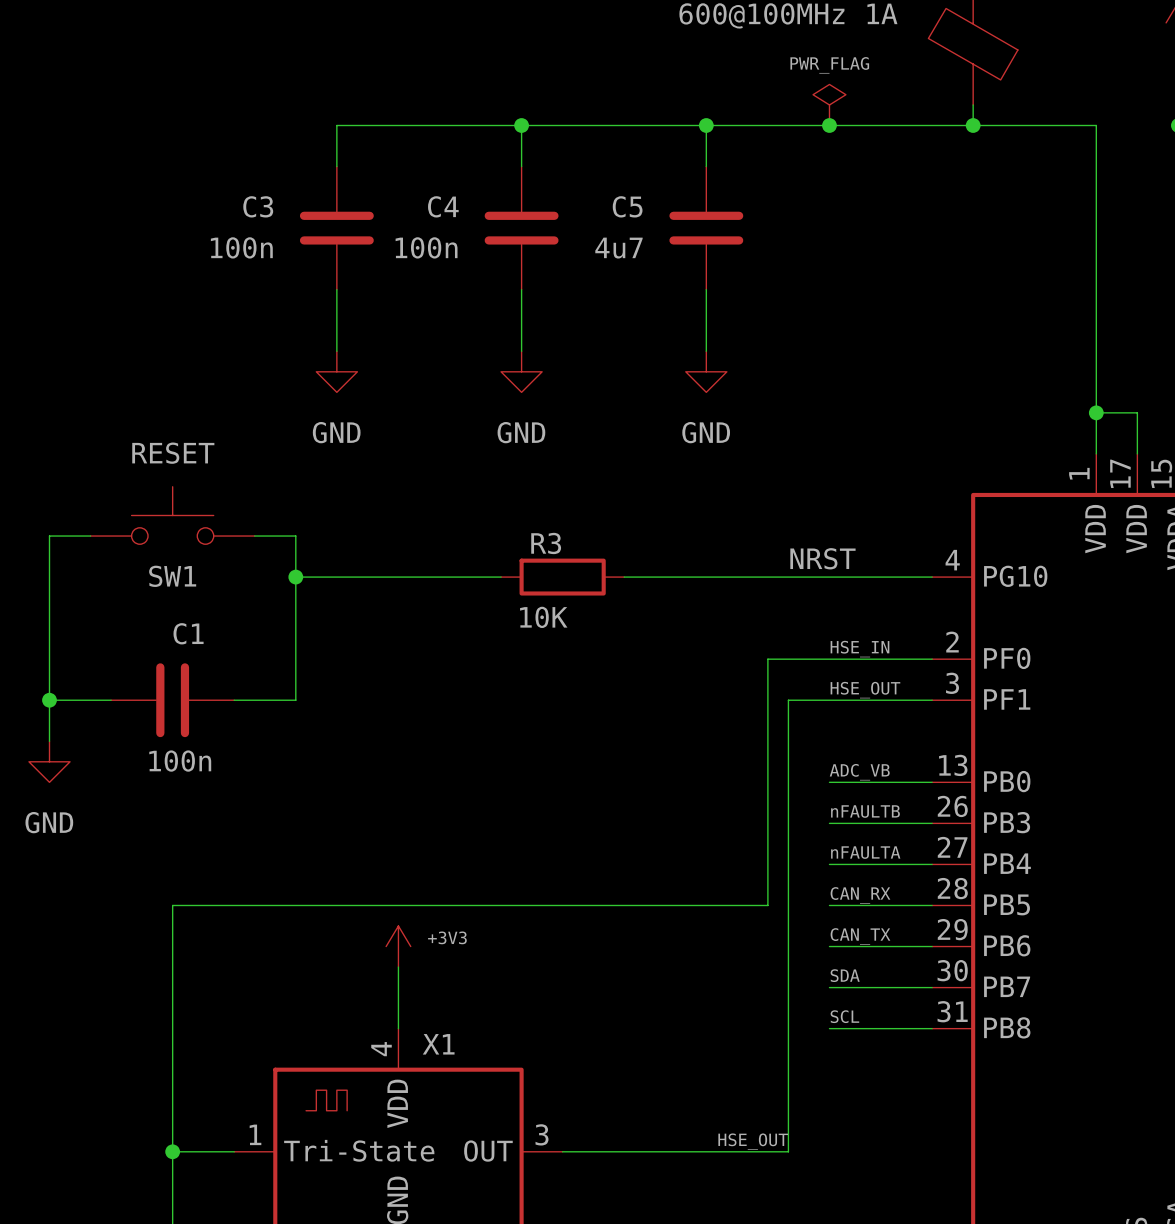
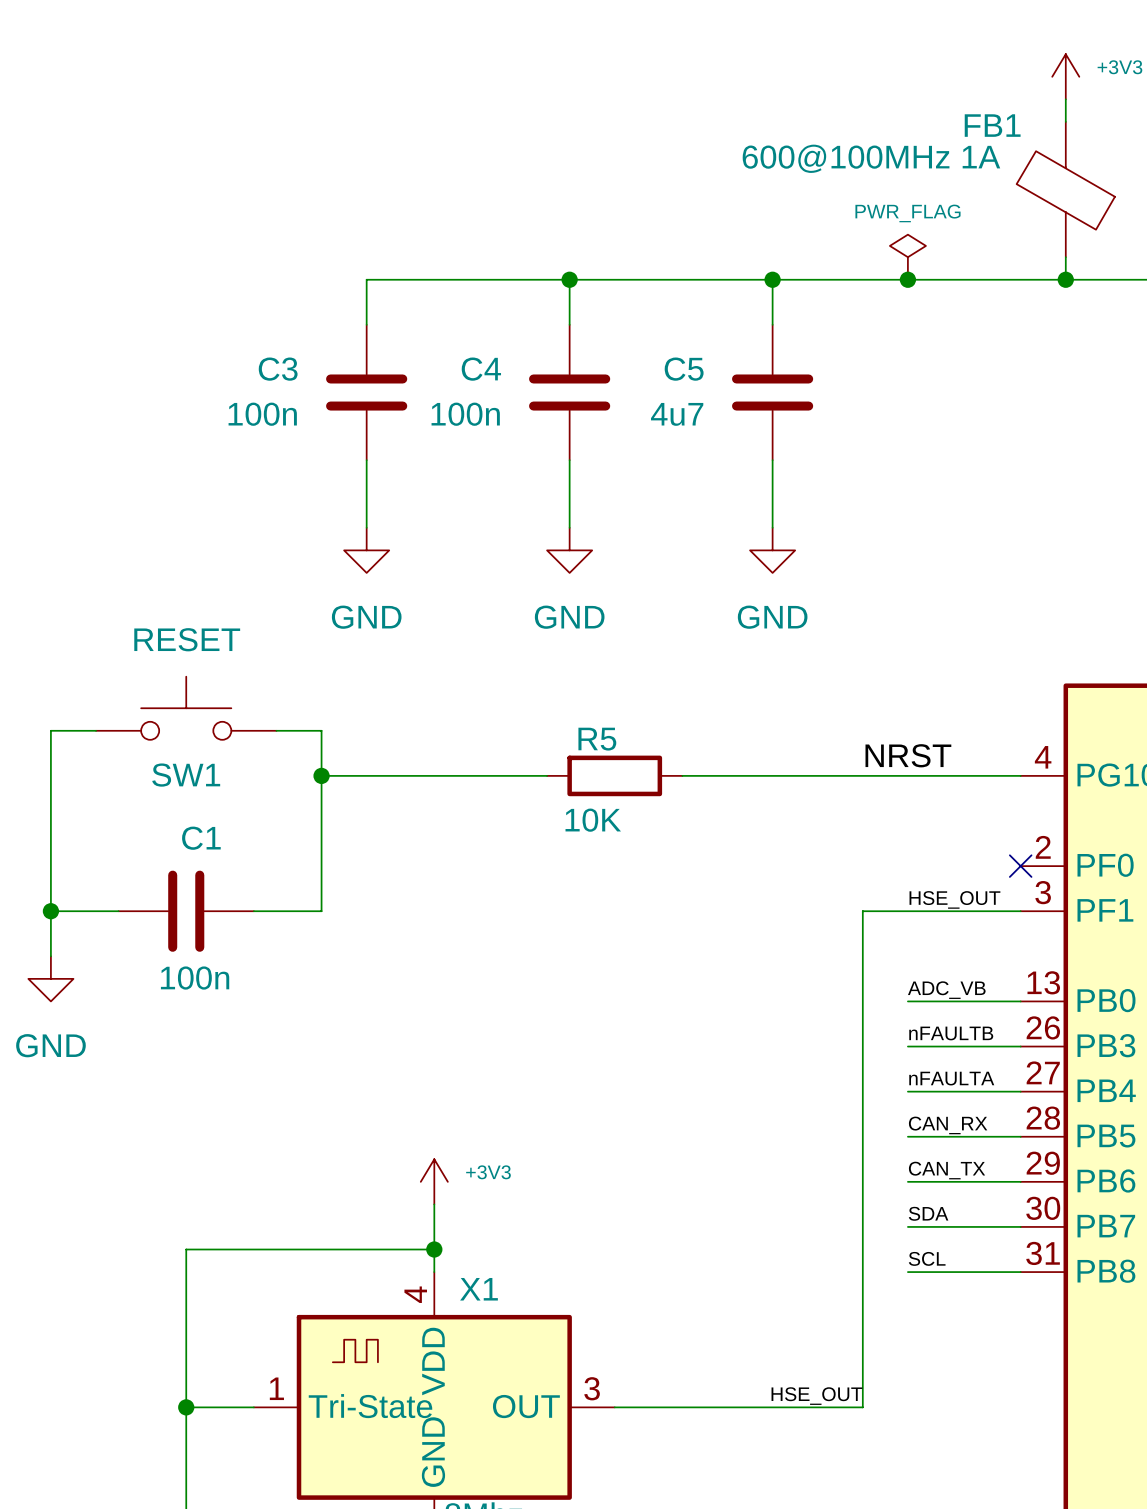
R3 name: R3 (546, 543) -> R5 (597, 739)
label: HSE_IN (859, 649) -> none
wire: (932, 659) (767, 659) (767, 905) (172, 905) (172, 1008) -> (434, 1249) (186, 1249)
no-connect mark: none -> (1020, 866)
junction: none -> (434, 1249)

